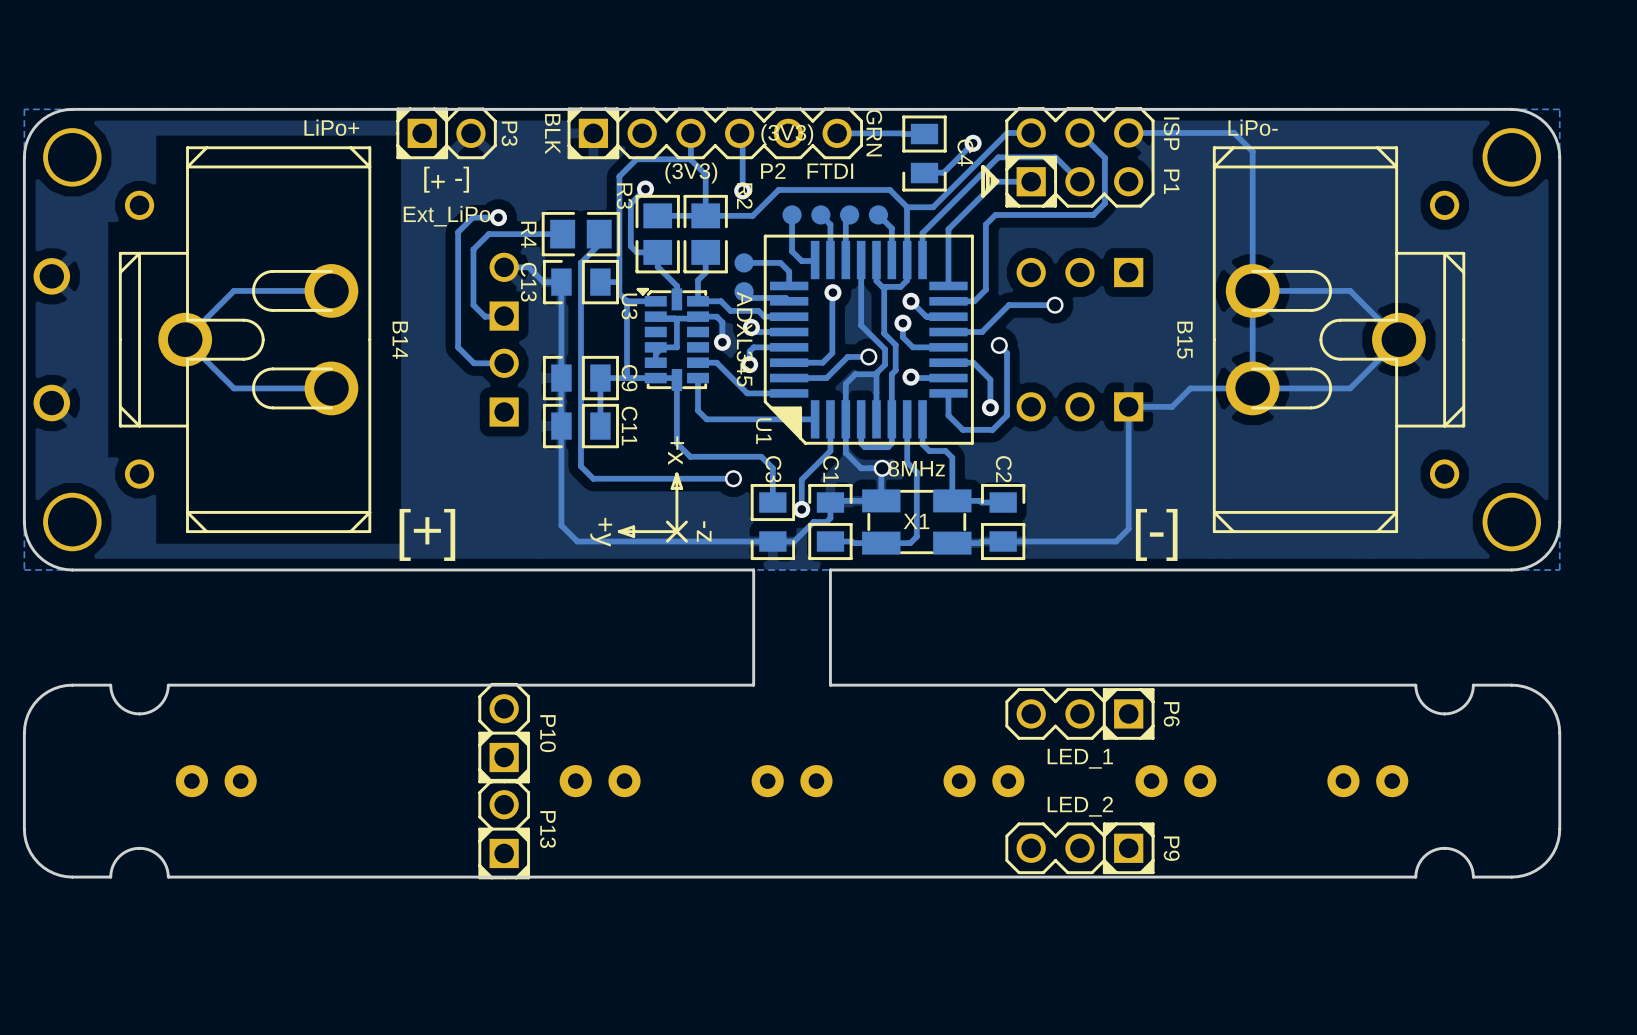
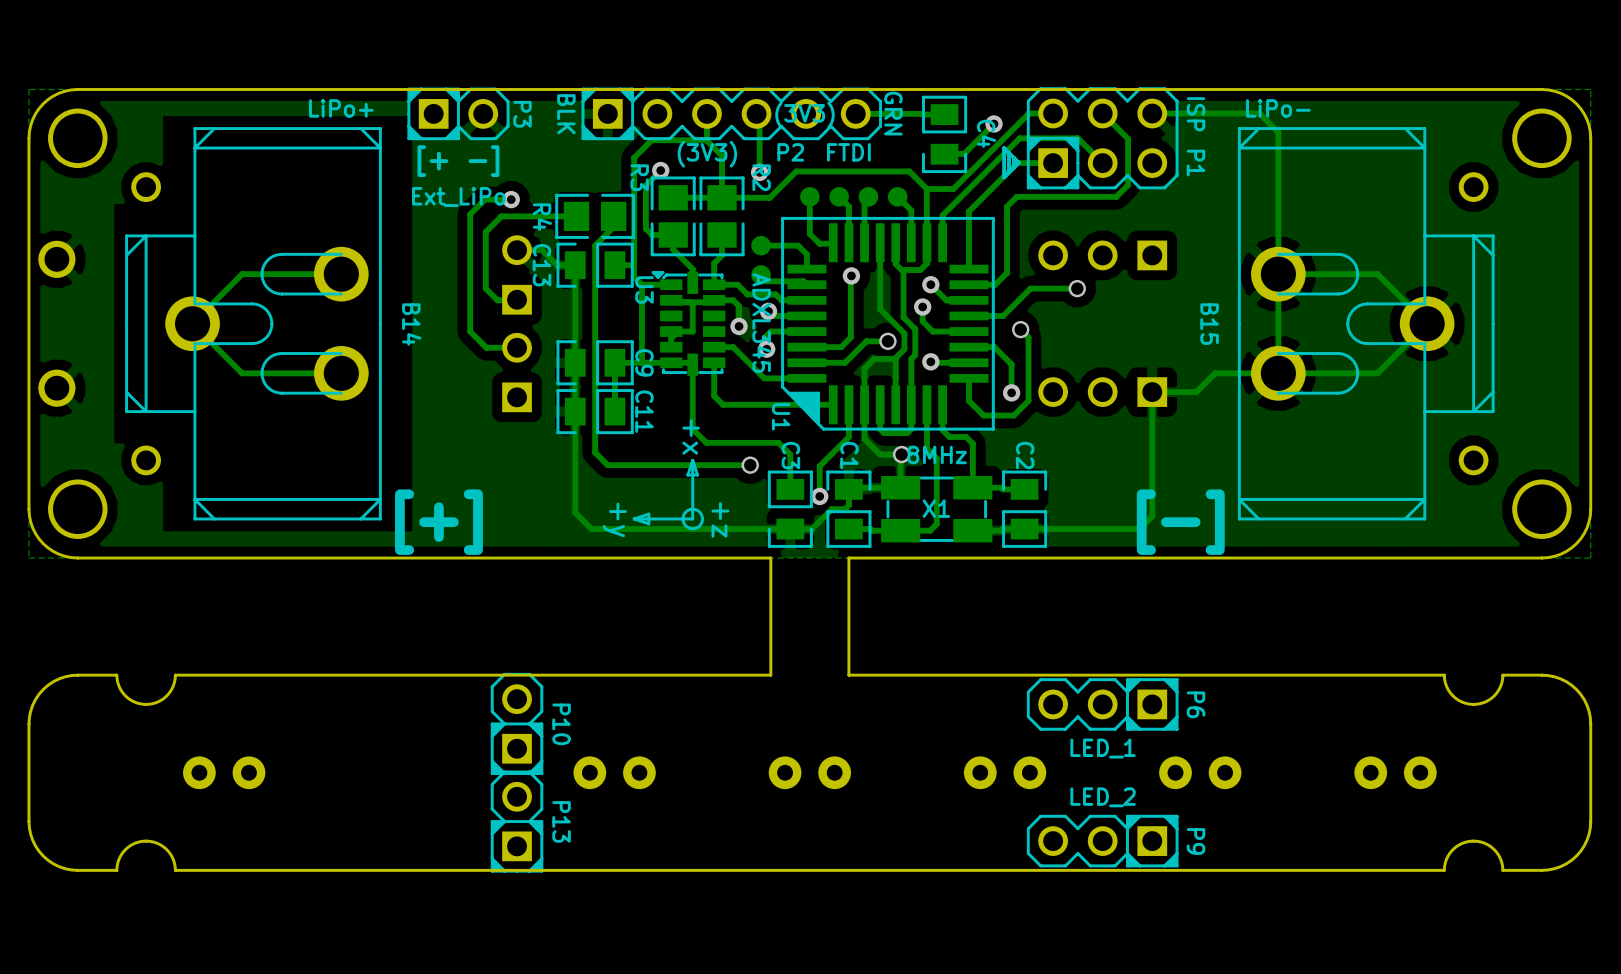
drawing: none -> [681, 507, 704, 531]
line: (667, 522) (686, 541) -> none
line: (686, 522) (667, 541) -> none
text: -z (704, 531) -> +z (720, 519)

